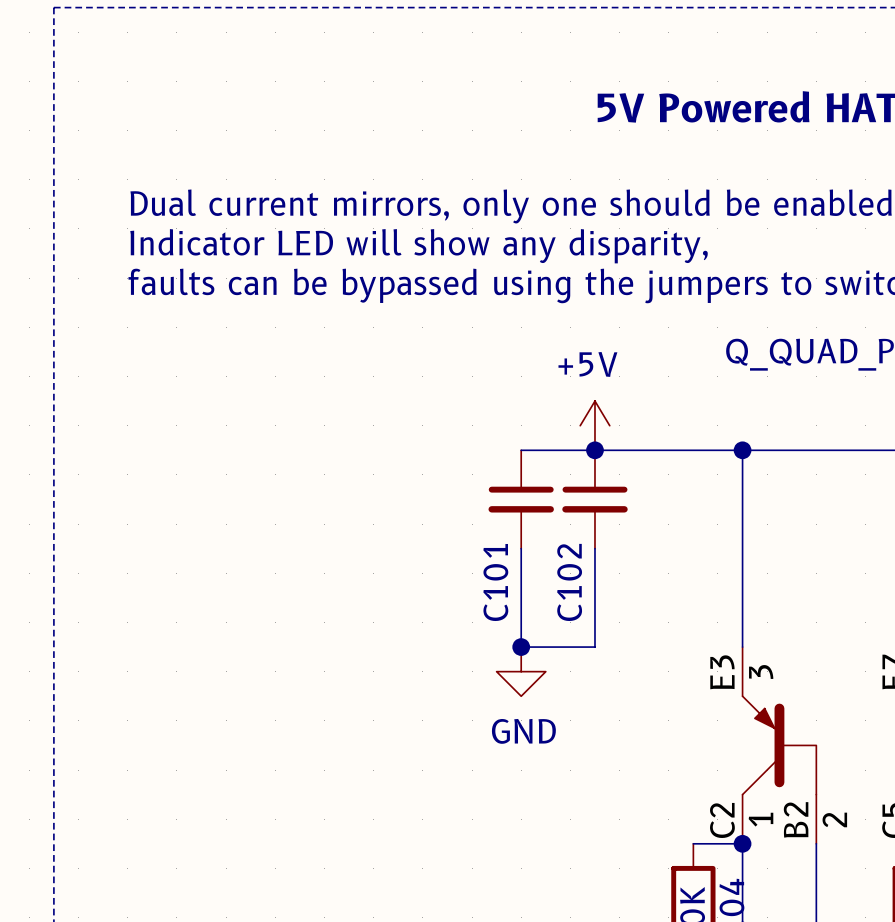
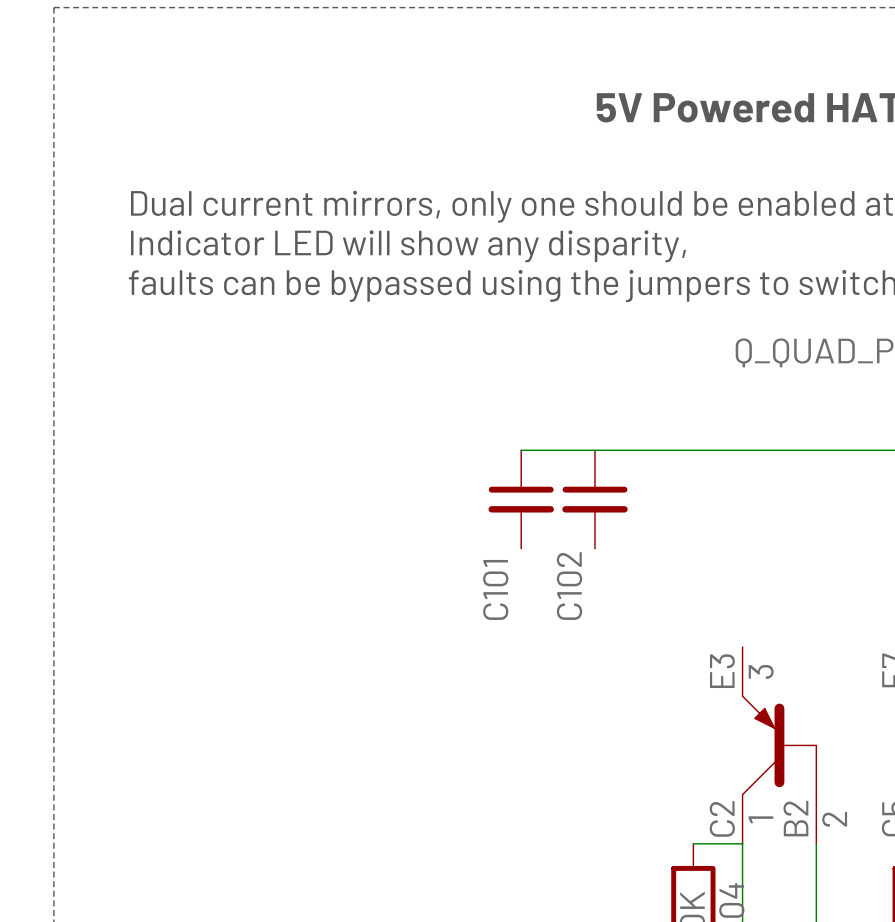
power symbol: +5V (594, 425) -> none
junction: (594, 450) -> none
wire: (742, 450) (742, 647) -> none
junction: (742, 450) -> none
wire: (521, 548) (521, 647) (594, 647) (594, 548) -> none
junction: (521, 647) -> none
power symbol: GND (521, 671) -> none
junction: (742, 843) -> none

